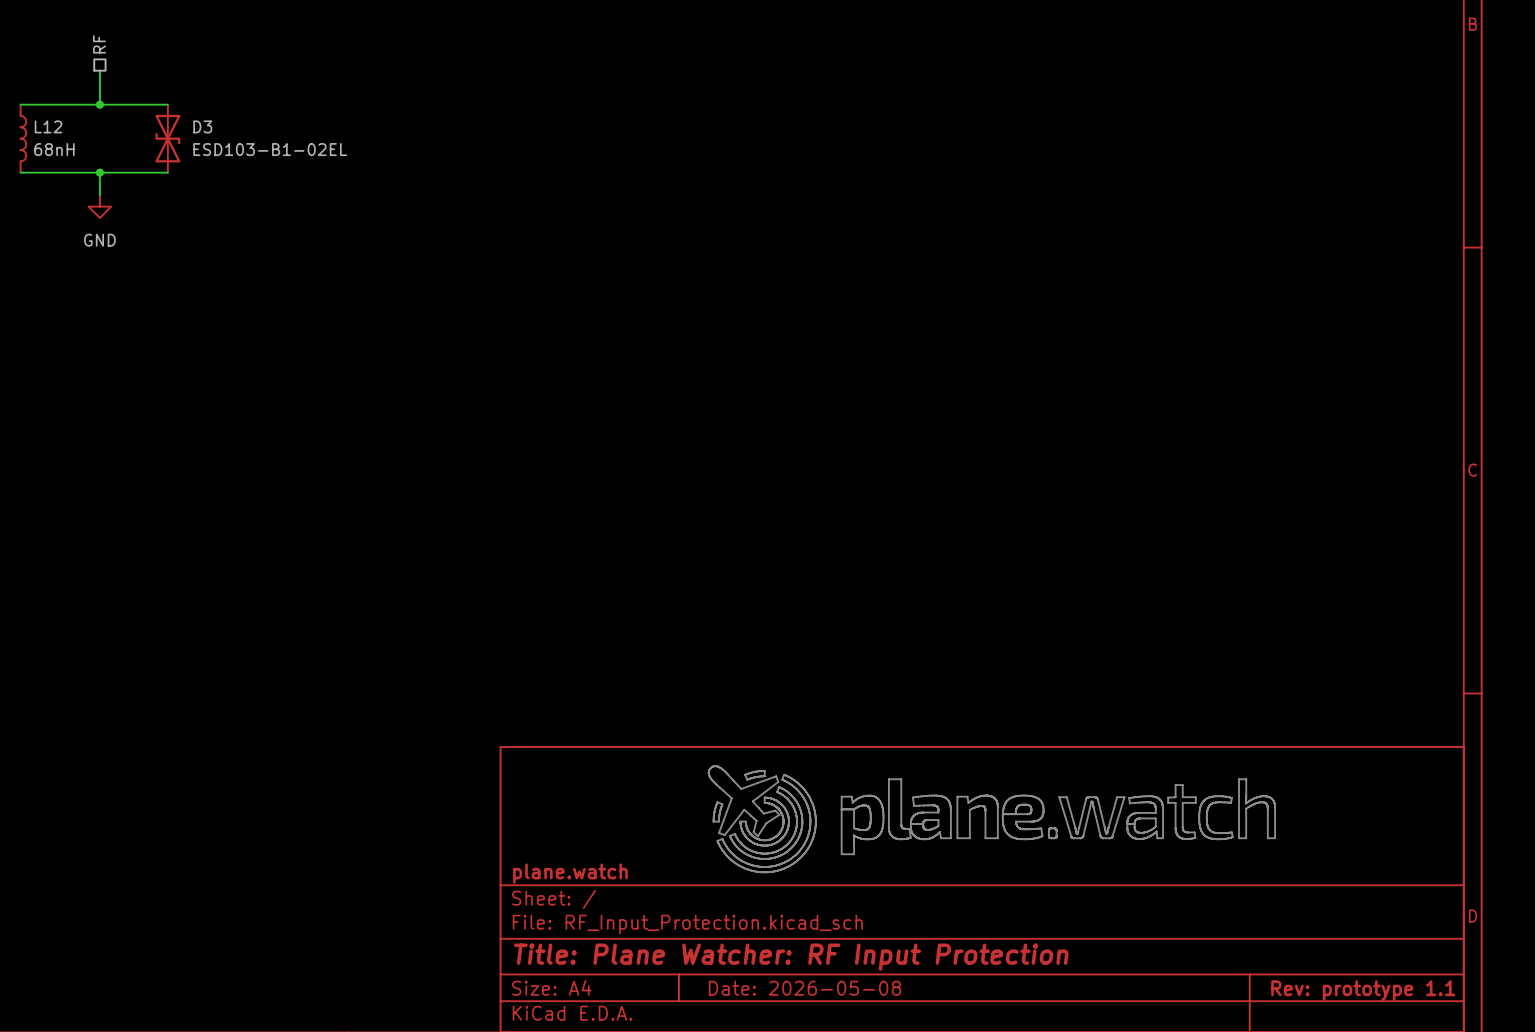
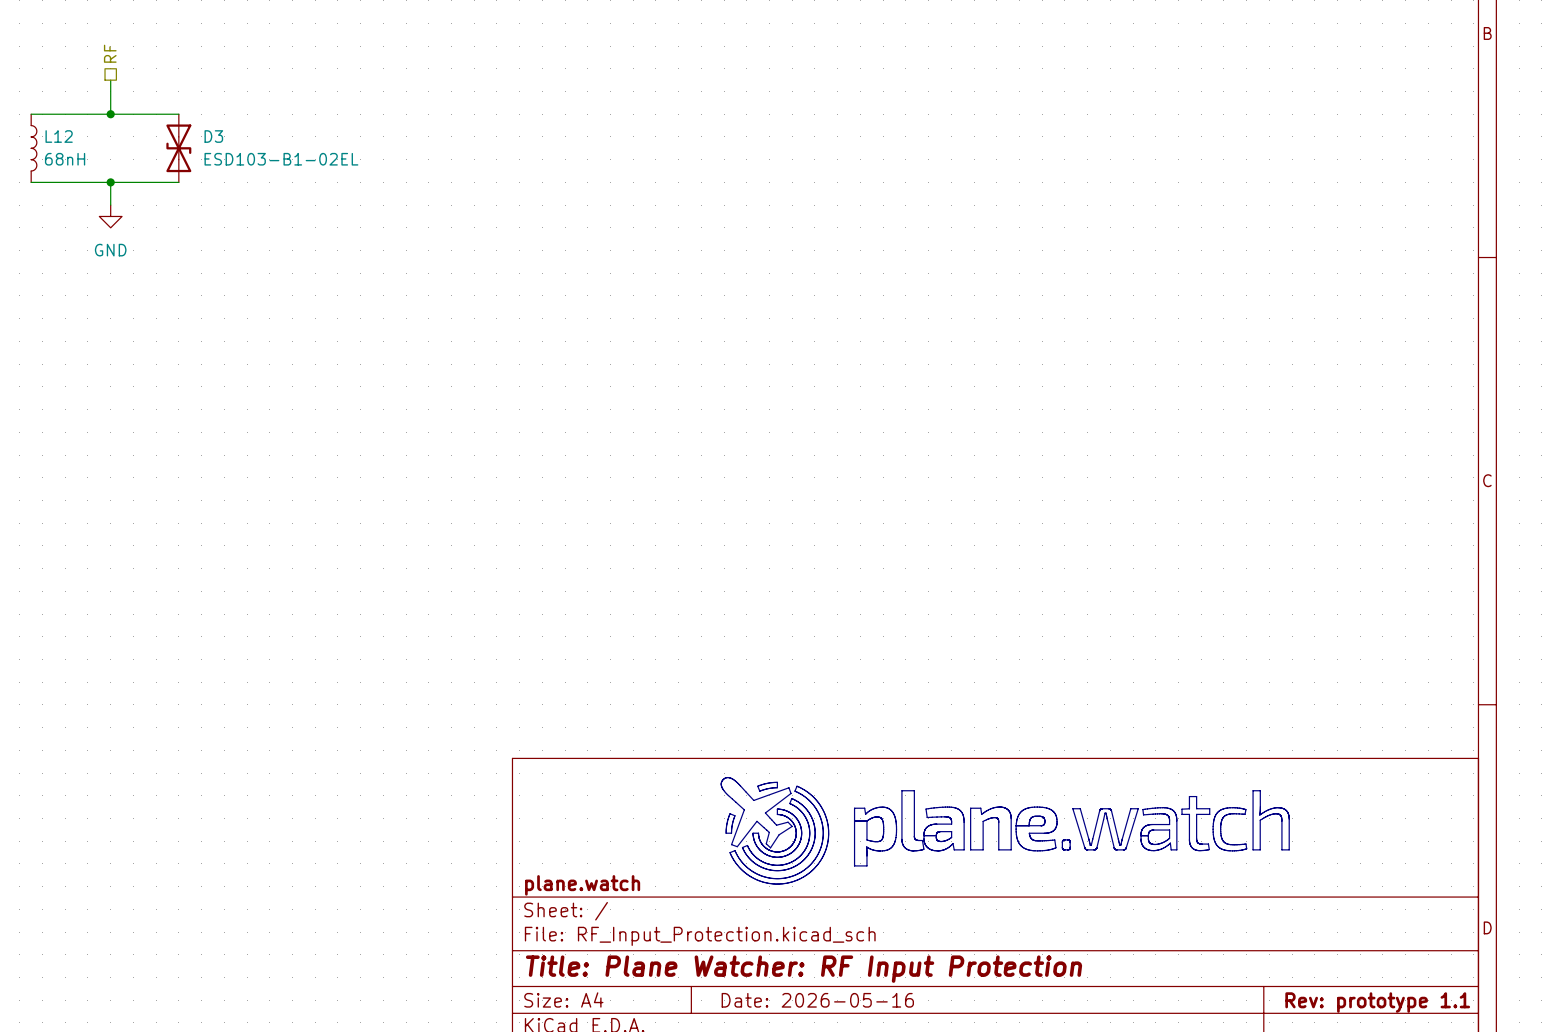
title block: Date: 2026-05-08 (805, 988) -> Date: 2026-05-16 (817, 1000)

